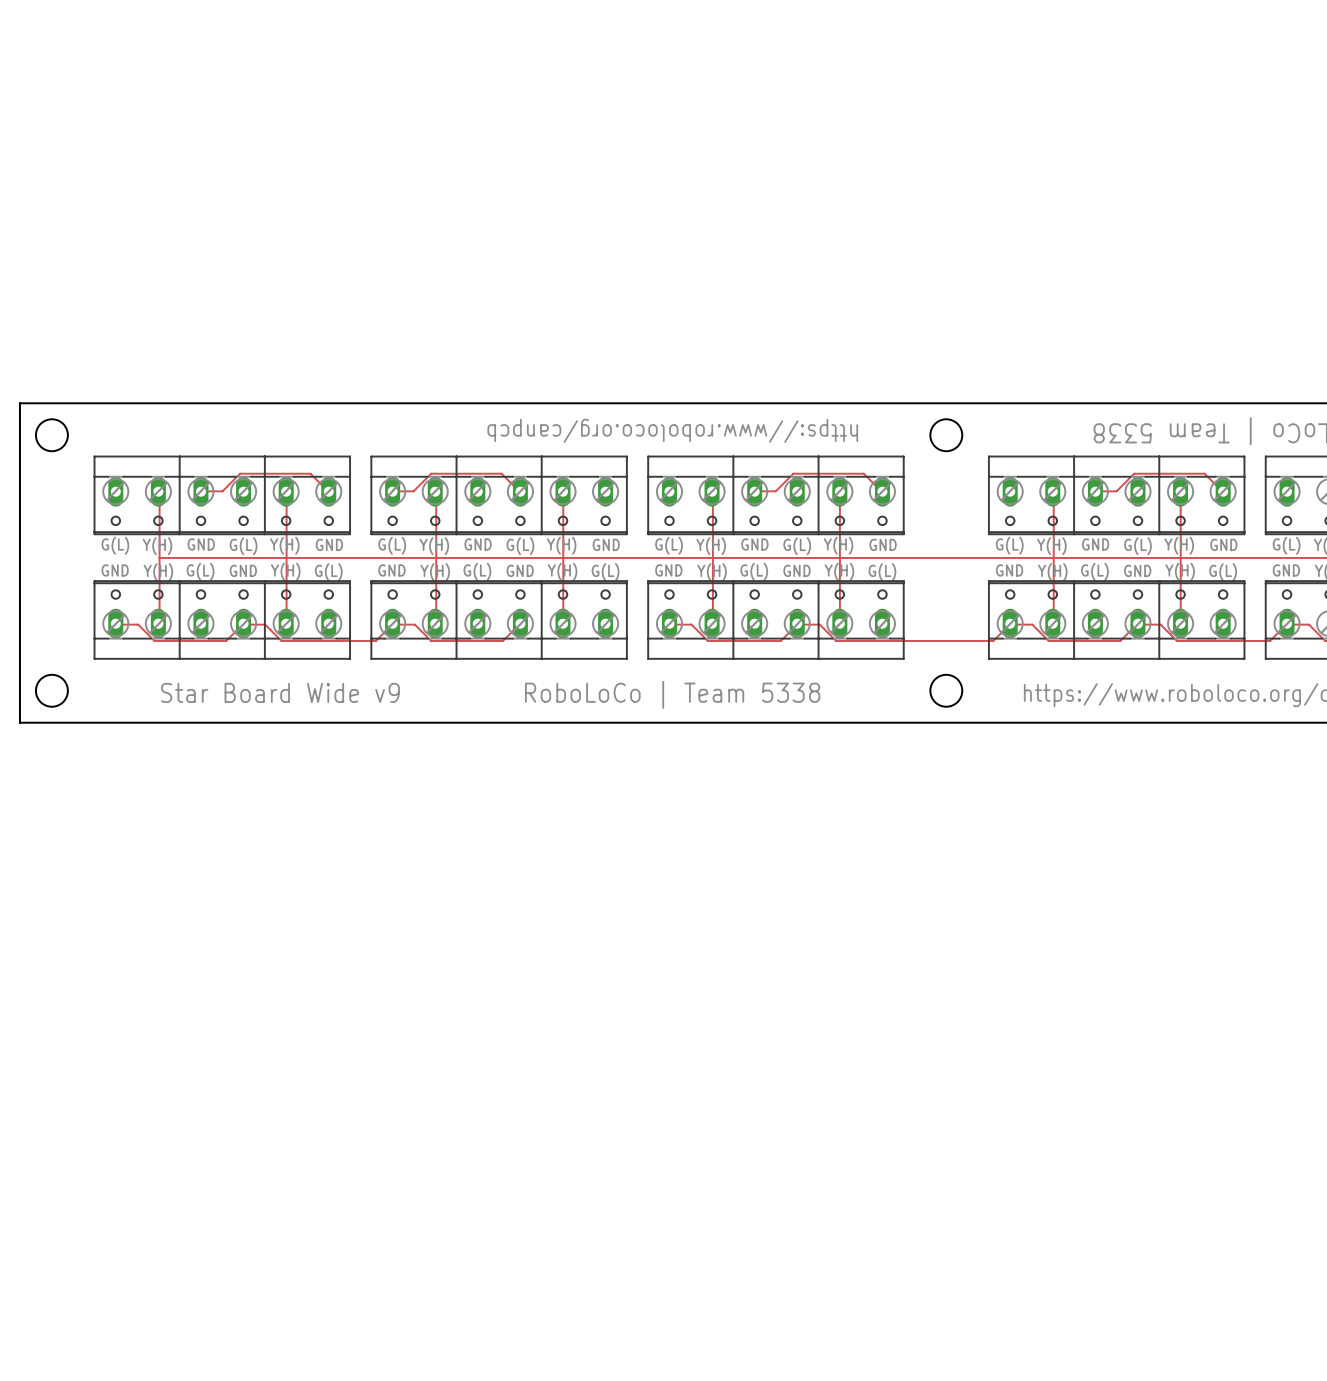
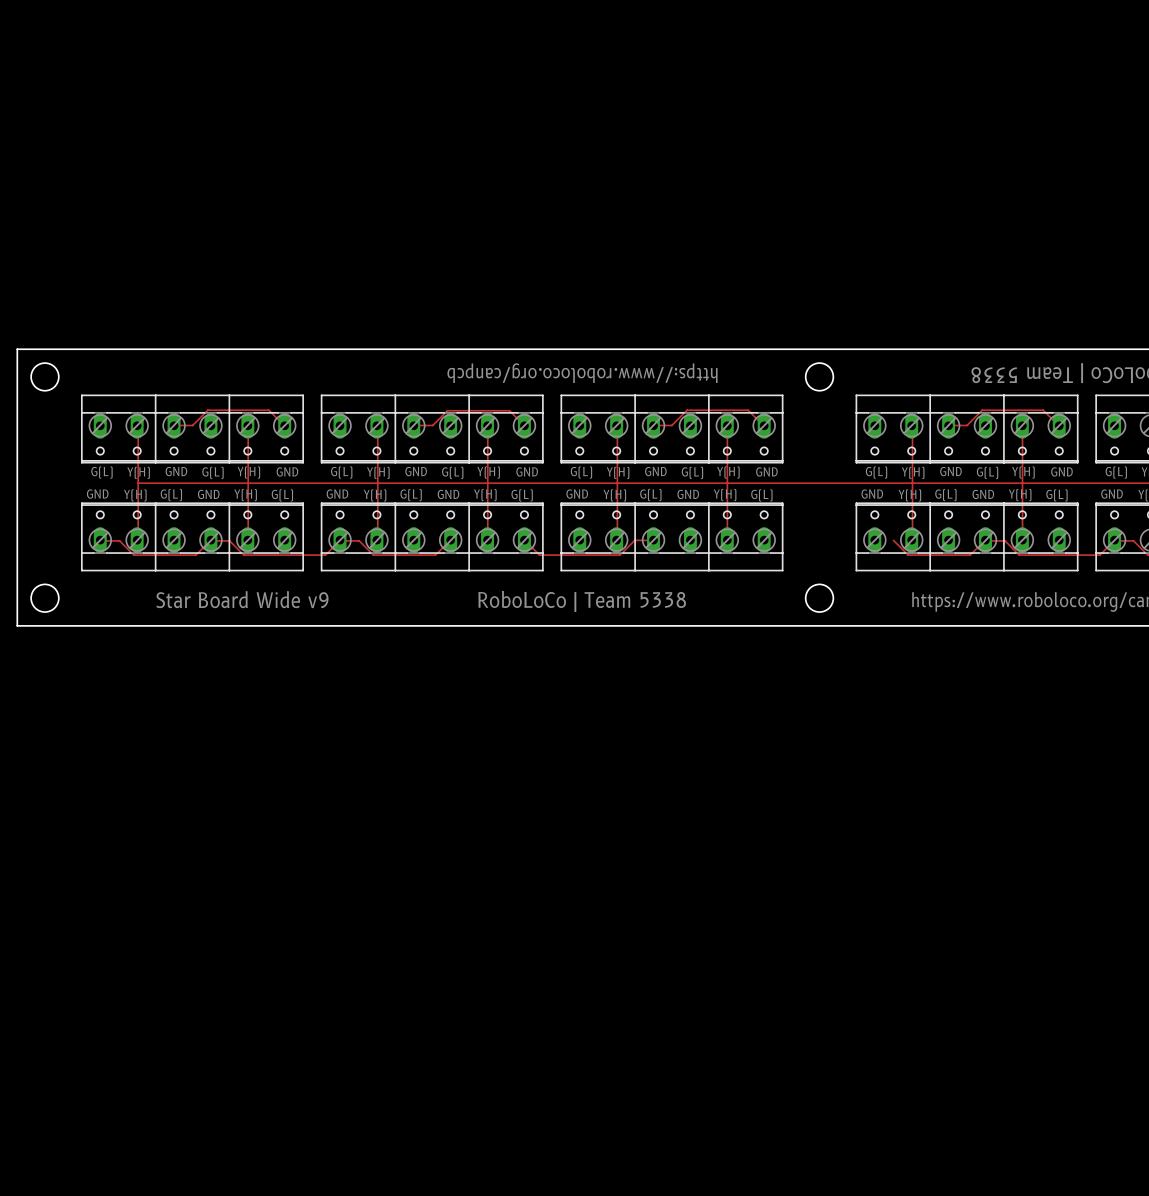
track: (392, 491) (413, 491) (431, 473) (501, 473) (520, 491) -> none
track: none -> (413, 425) (432, 425) (447, 410) (509, 410) (524, 425)
track: (669, 623) (691, 624) (707, 640) -> (524, 540) (539, 555) (613, 555)
track: (1032, 624) (1010, 623) (993, 640) (836, 640) (819, 624) (797, 623) (780, 640) (716, 640) -> (653, 540) (634, 540) (620, 555)

